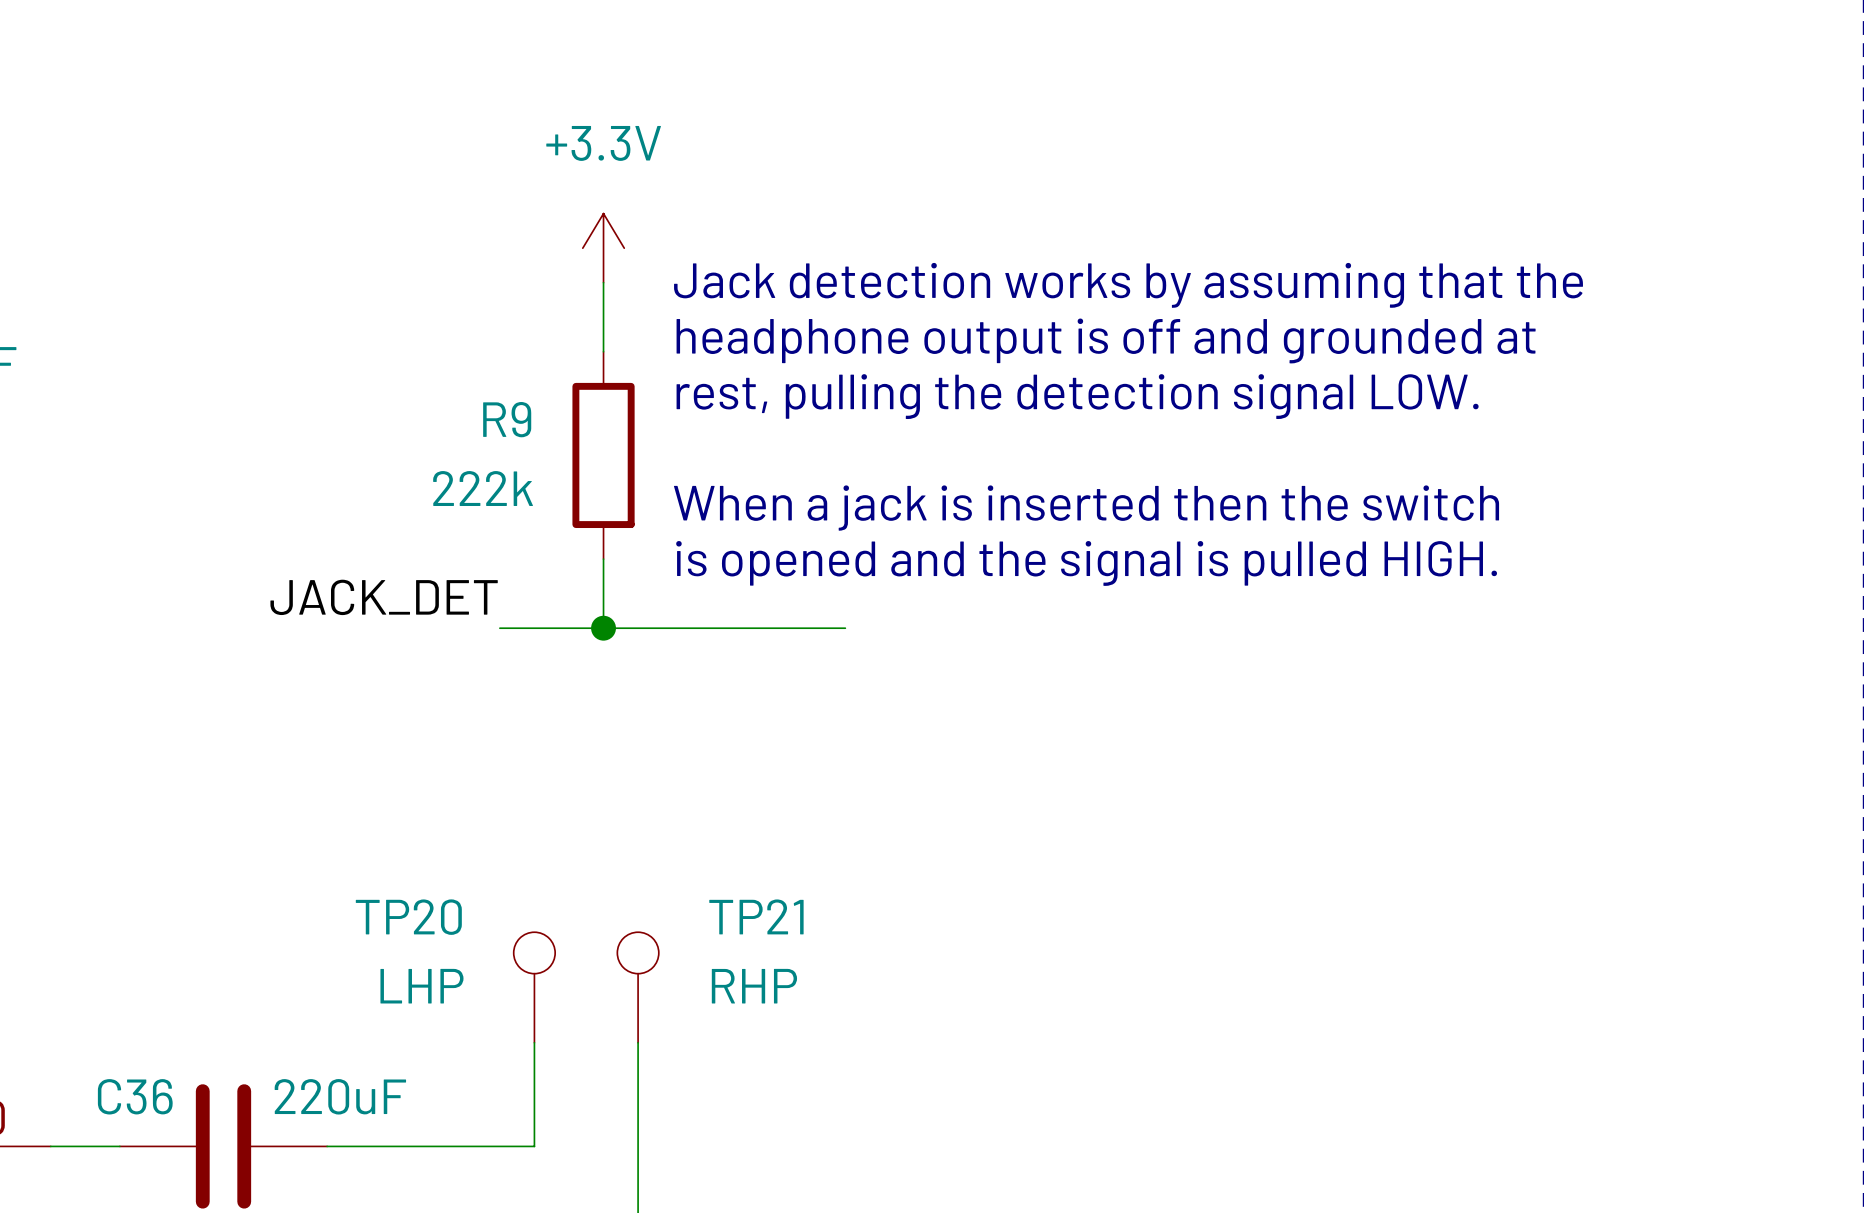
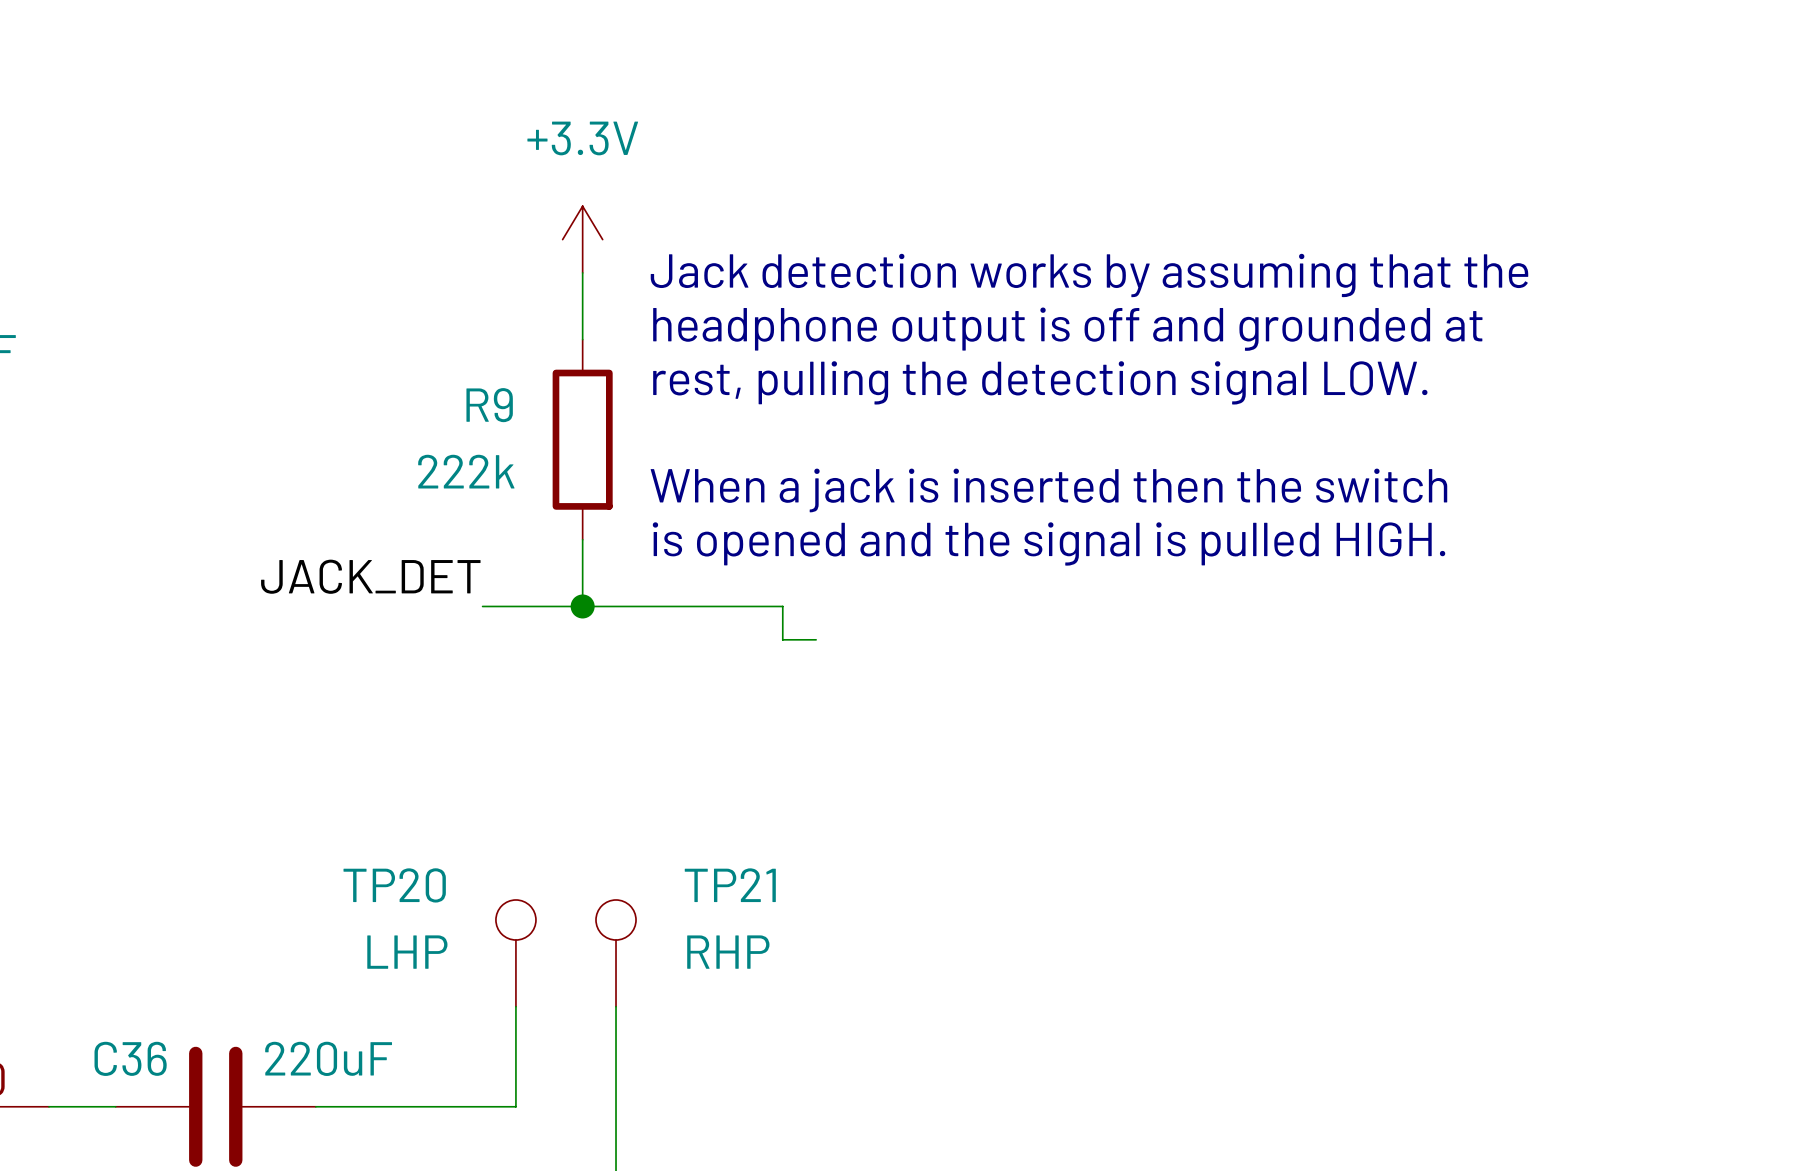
wire: (810, 628) (845, 628) -> (782, 606) (782, 639) (816, 639)

